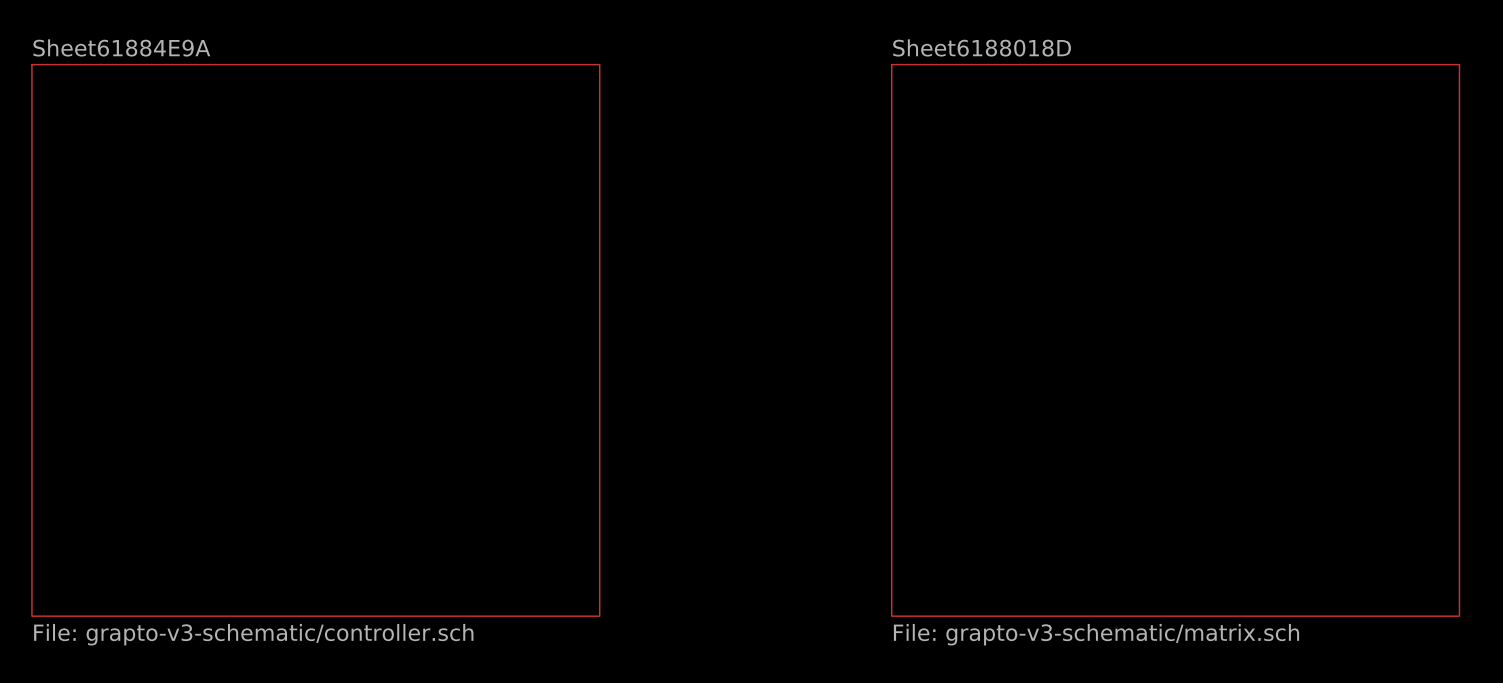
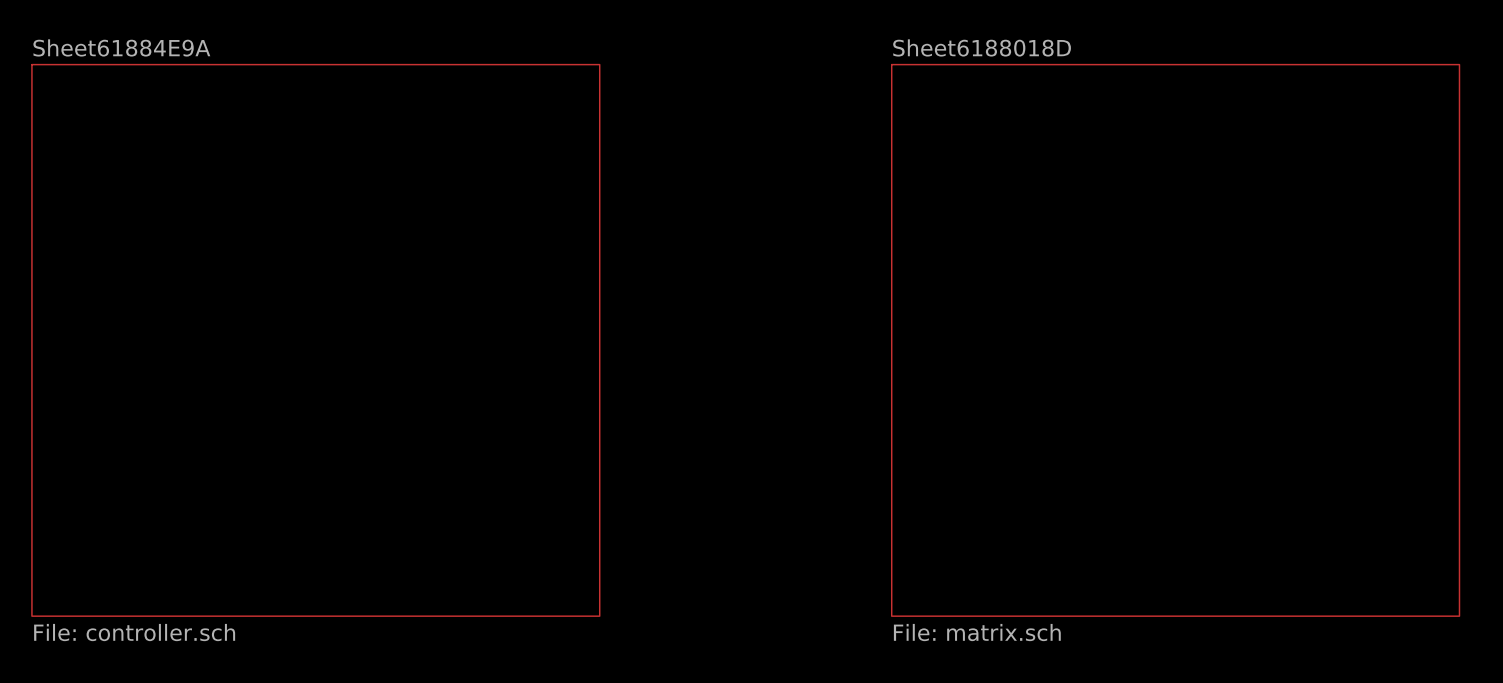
sheet Sheet61884E9A value: File: grapto-v3-schematic/controller.sch (253, 634) -> File: controller.sch (134, 632)
sheet Sheet6188018D value: File: grapto-v3-schematic/matrix.sch (1096, 634) -> File: matrix.sch (977, 632)

